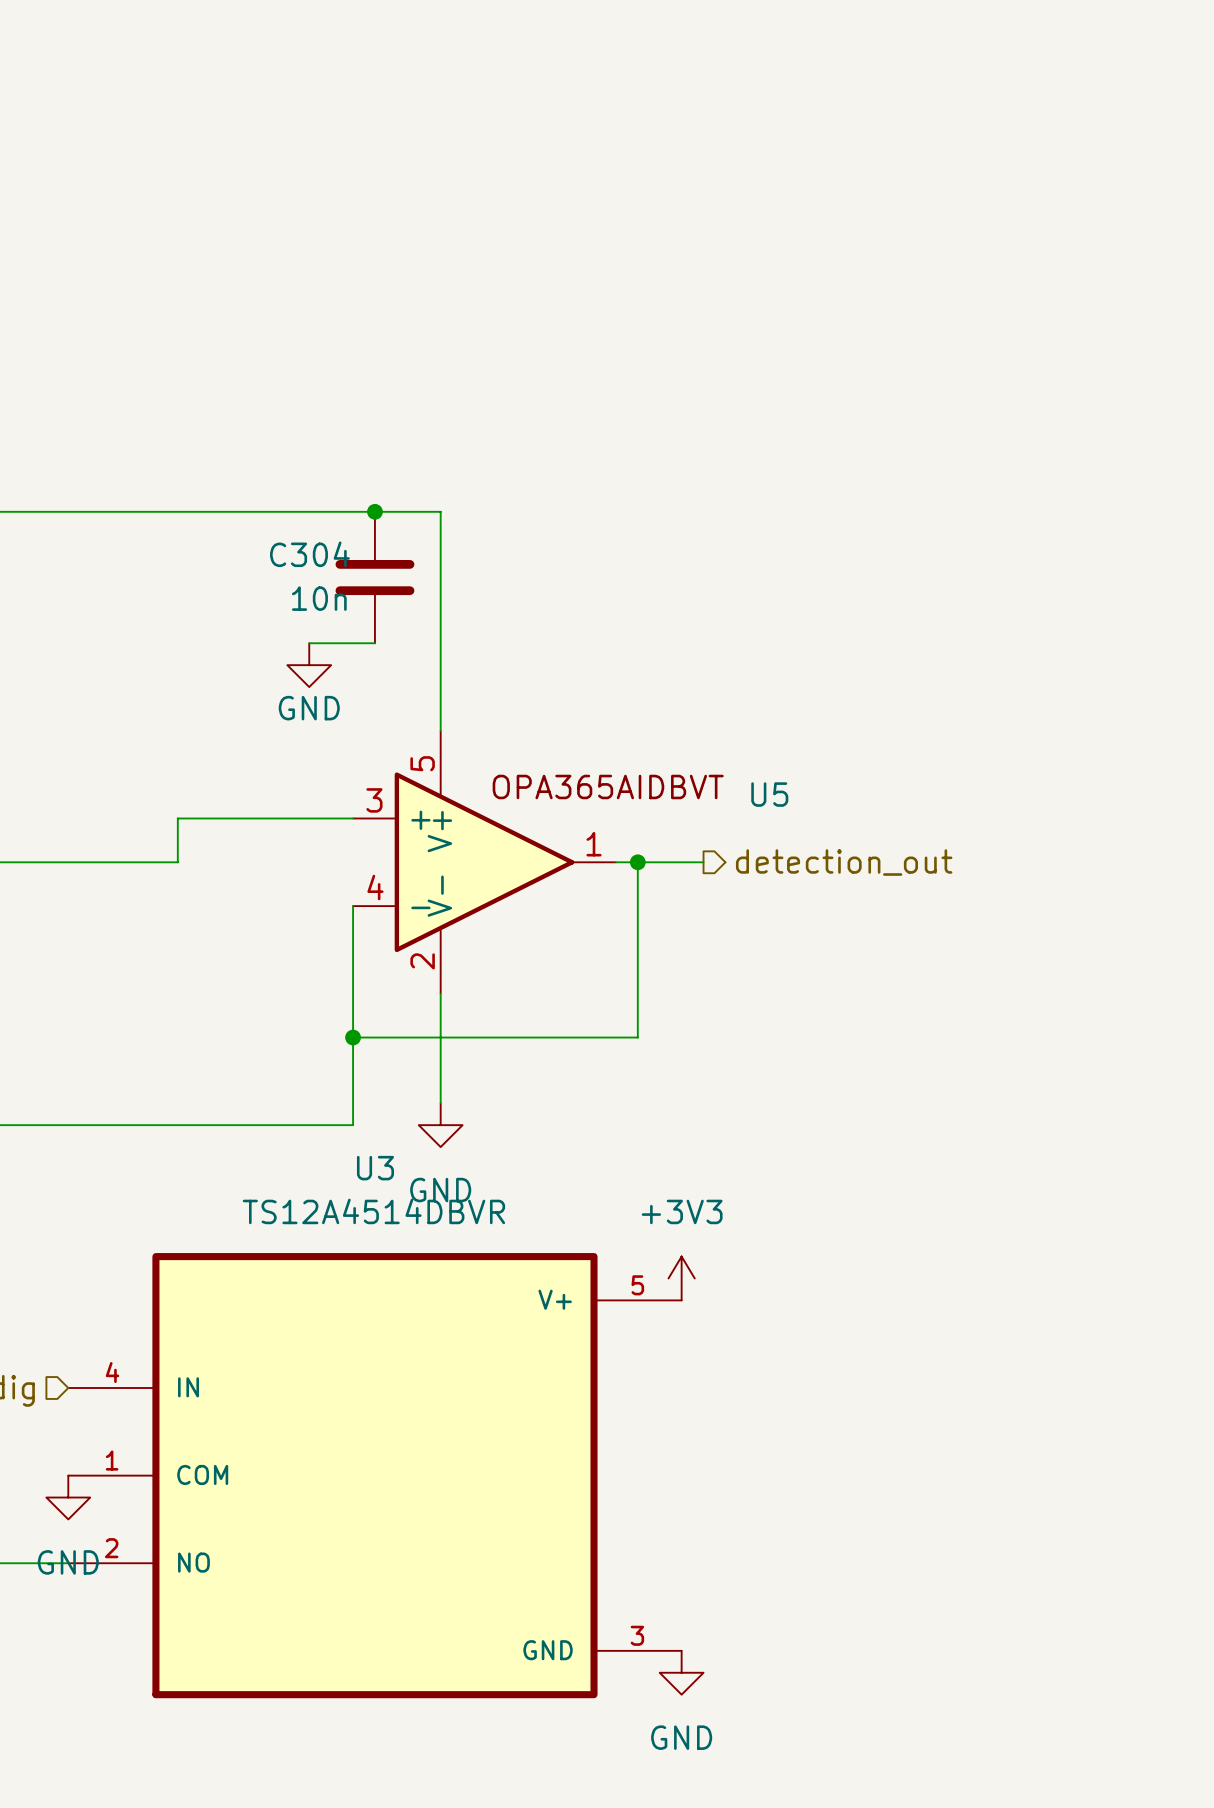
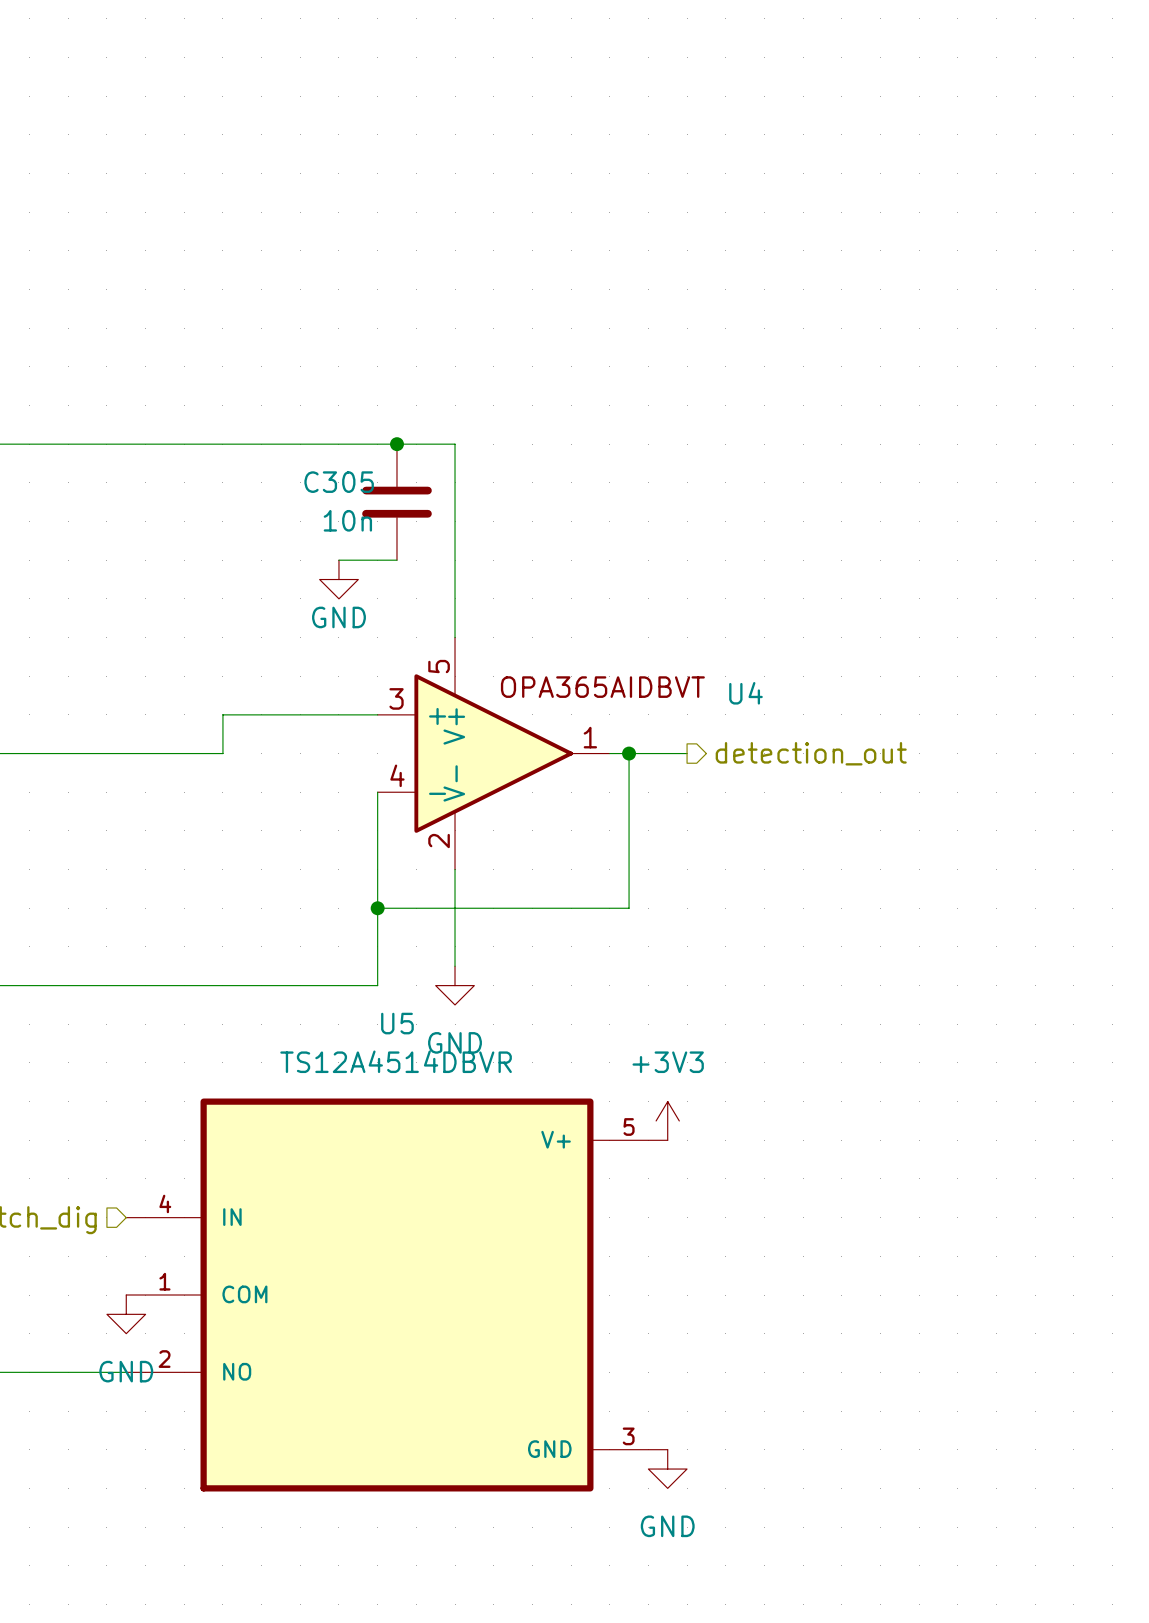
C304 name: C304 (309, 554) -> C305 (339, 482)
U5 name: U5 (769, 794) -> U4 (745, 693)
U3 name: U3 (375, 1168) -> U5 (397, 1023)

